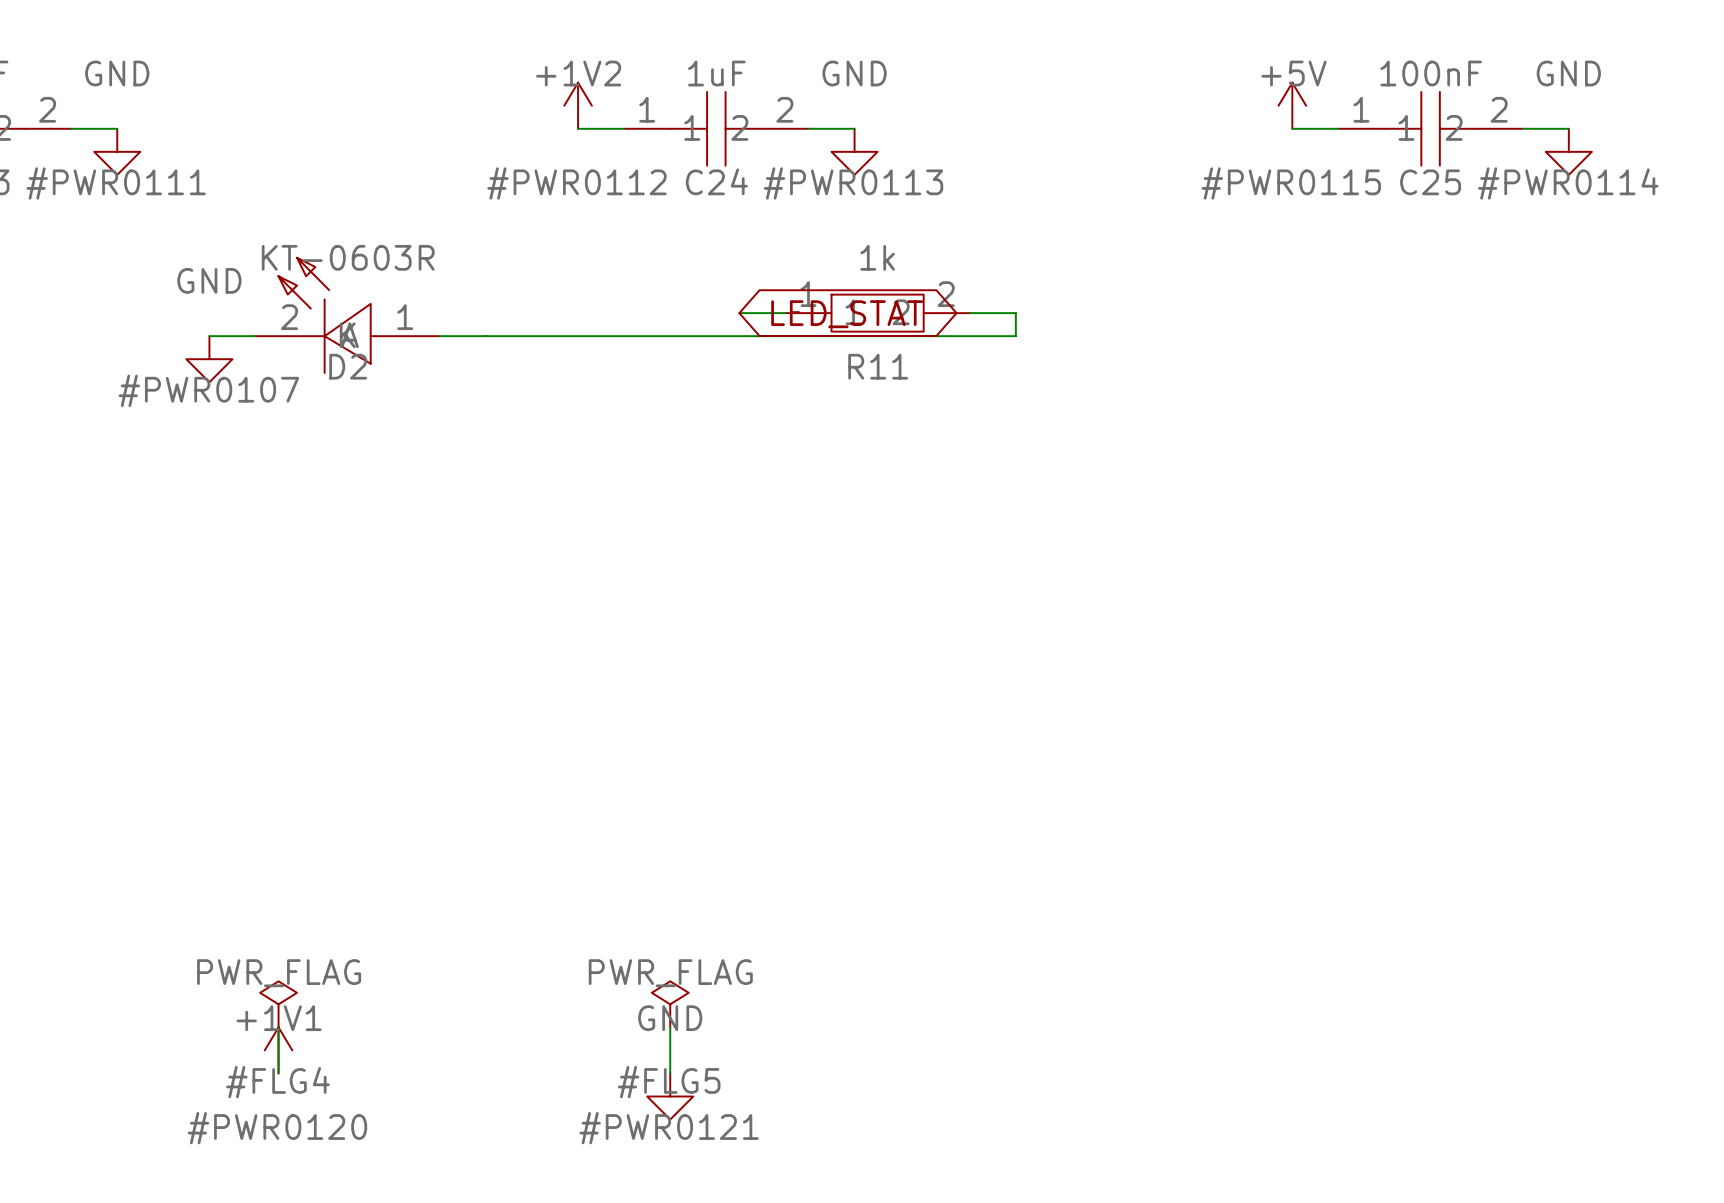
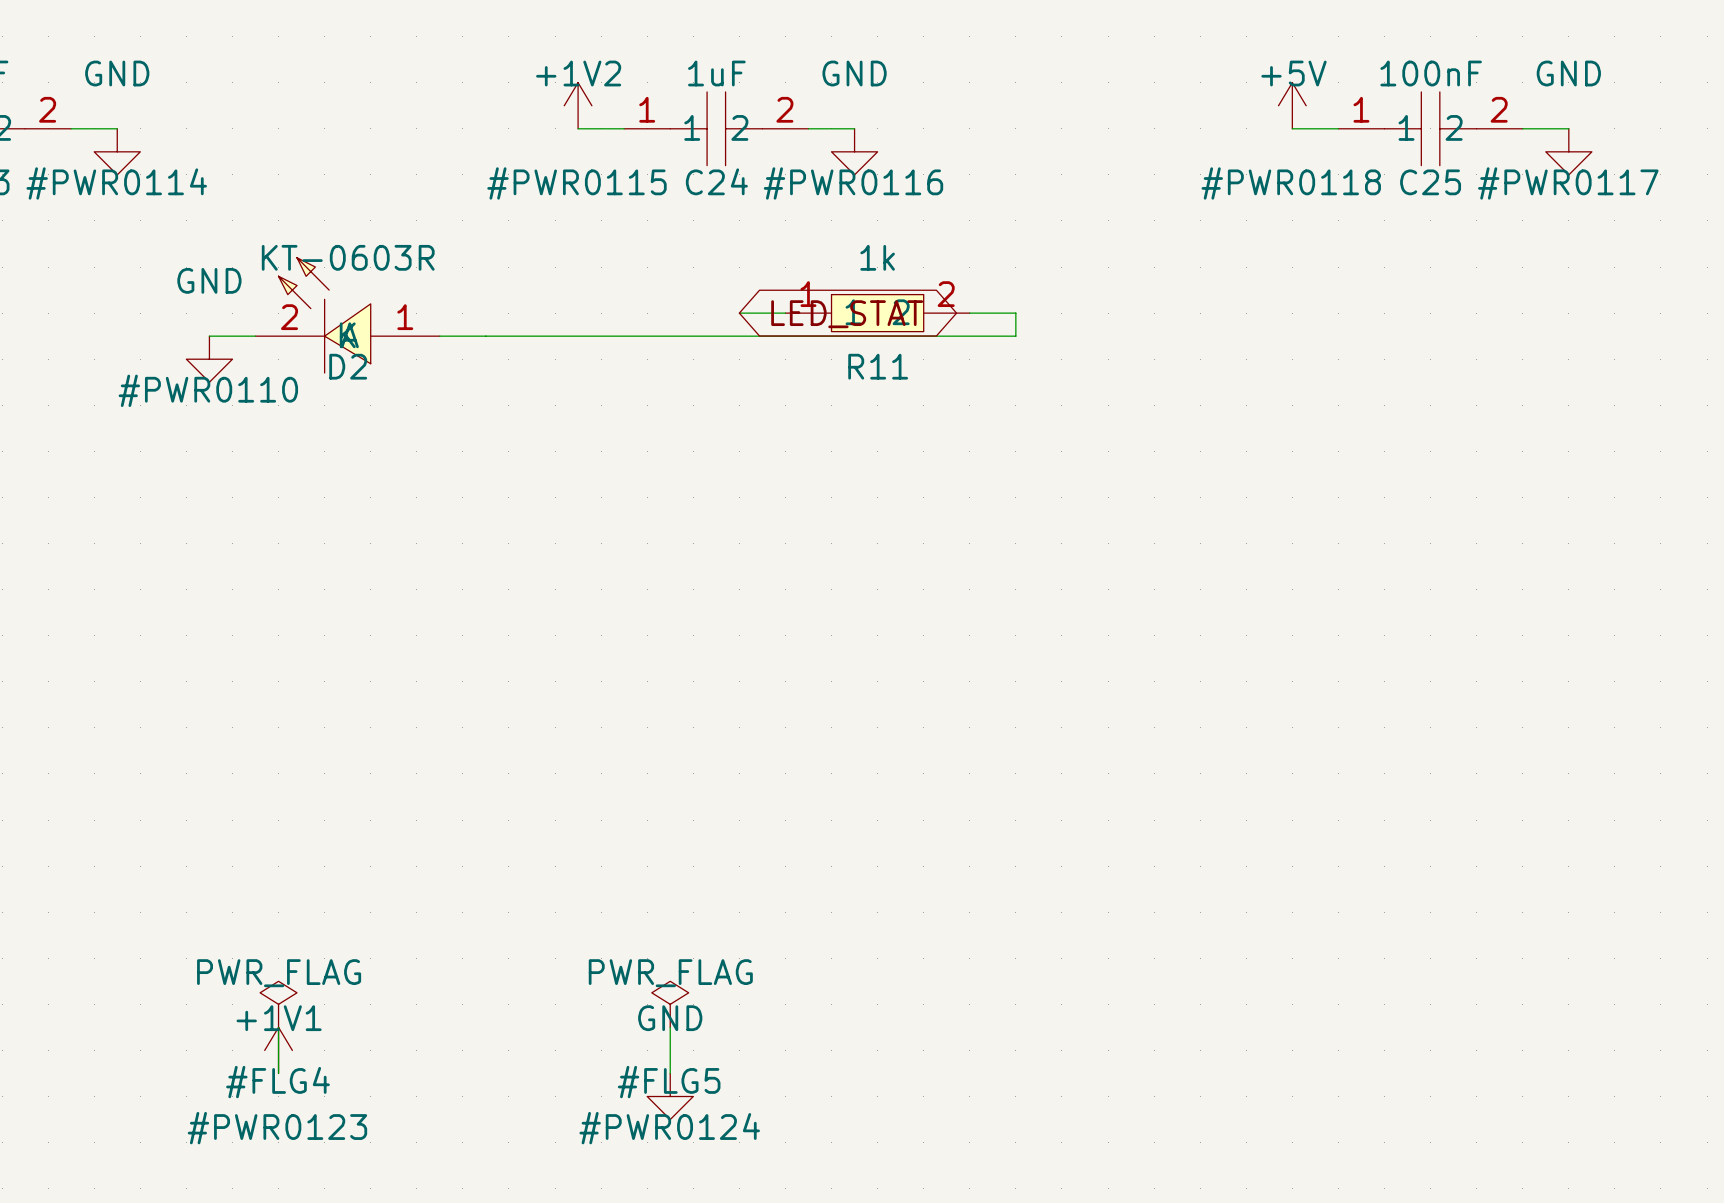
#PWR0111 name: #PWR0111 (116, 183) -> #PWR0114 (116, 183)
#PWR0112 name: #PWR0112 (576, 183) -> #PWR0115 (576, 183)
#PWR0113 name: #PWR0113 (853, 183) -> #PWR0116 (853, 183)
#PWR0115 name: #PWR0115 (1291, 183) -> #PWR0118 (1291, 183)
#PWR0114 name: #PWR0114 (1568, 183) -> #PWR0117 (1568, 183)
#PWR0107 name: #PWR0107 (208, 390) -> #PWR0110 (208, 390)
#PWR0120 name: #PWR0120 (277, 1128) -> #PWR0123 (277, 1128)
#PWR0121 name: #PWR0121 (669, 1128) -> #PWR0124 (669, 1128)

